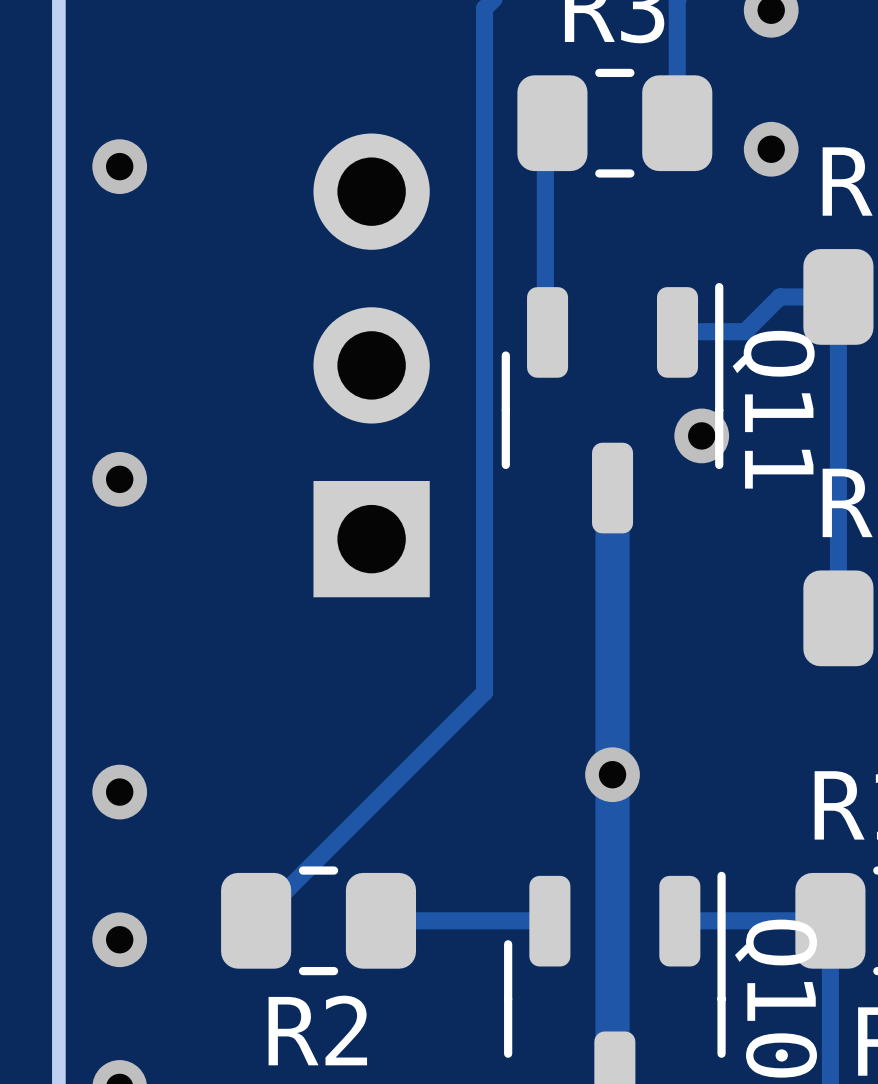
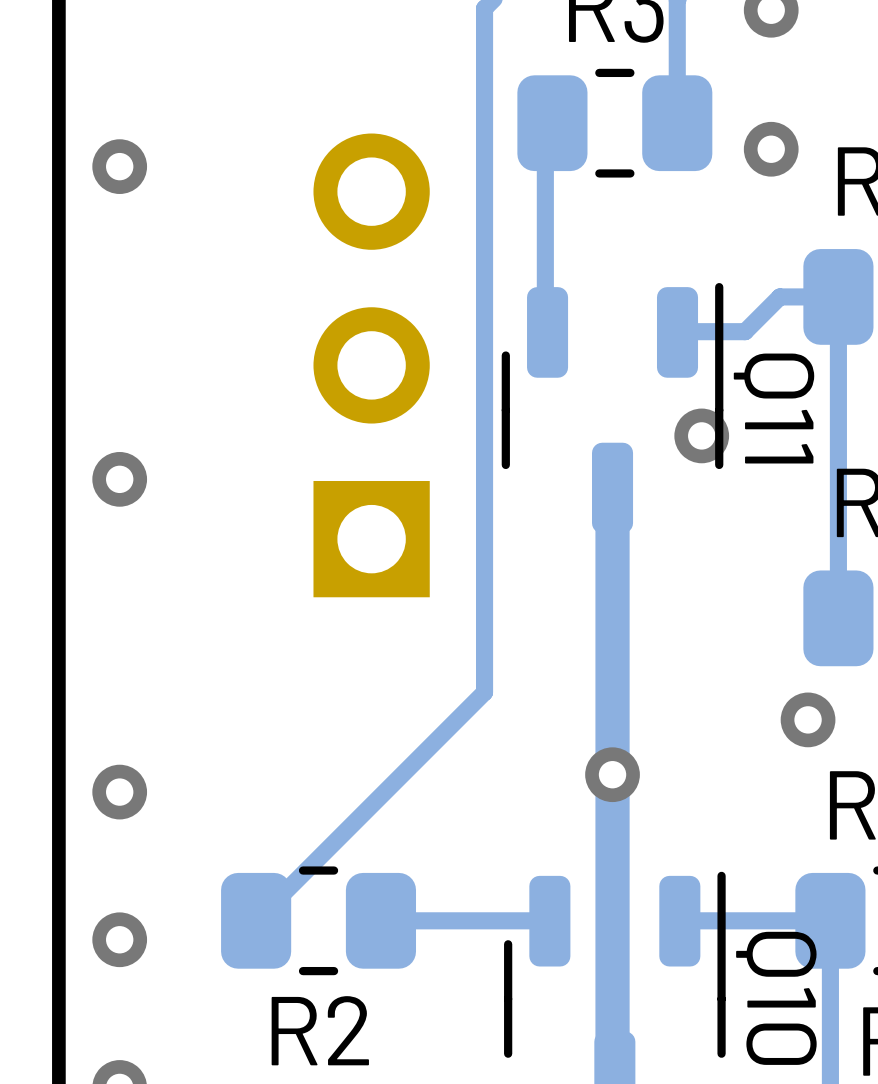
via: none -> (808, 719)

